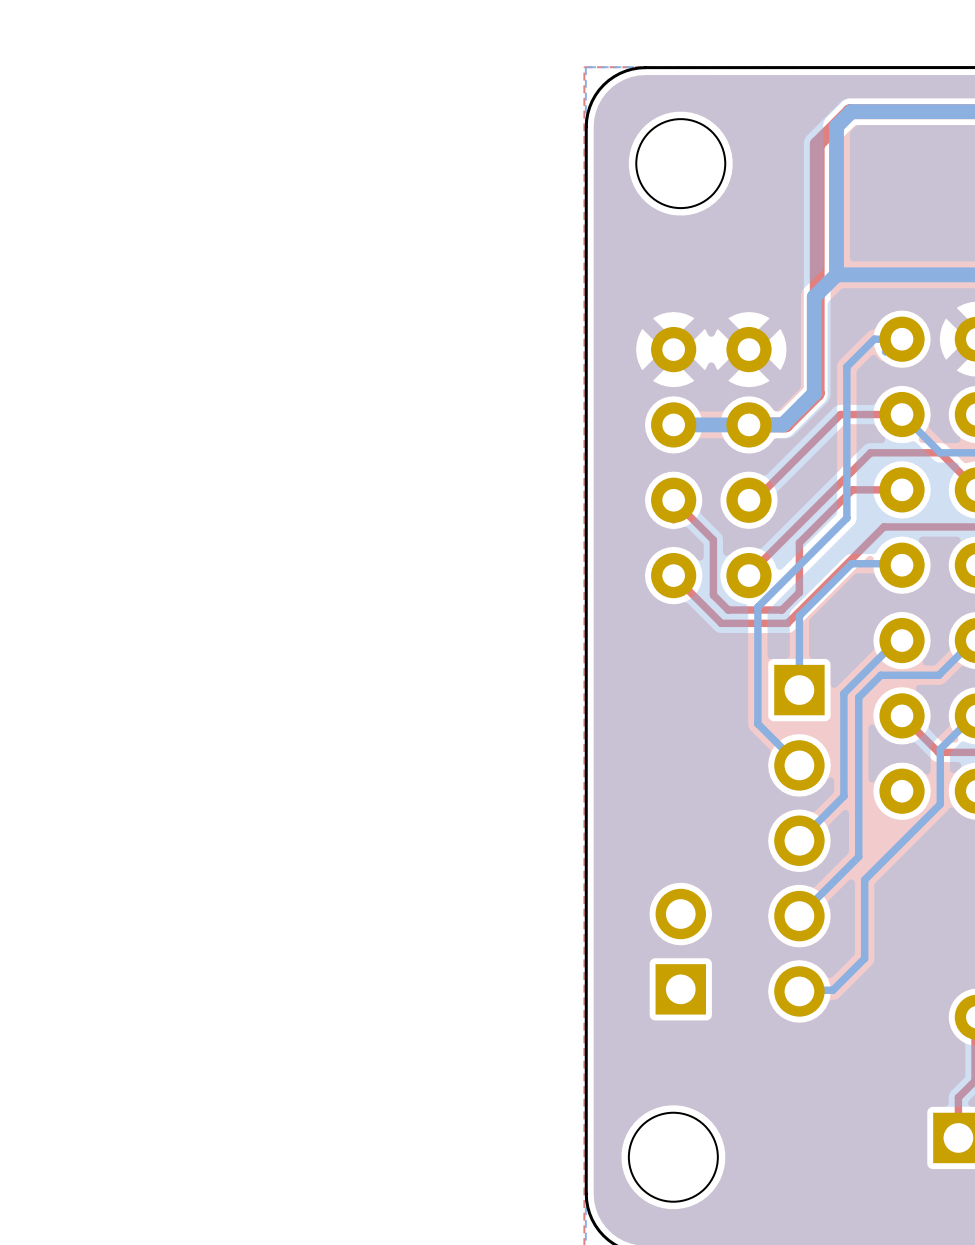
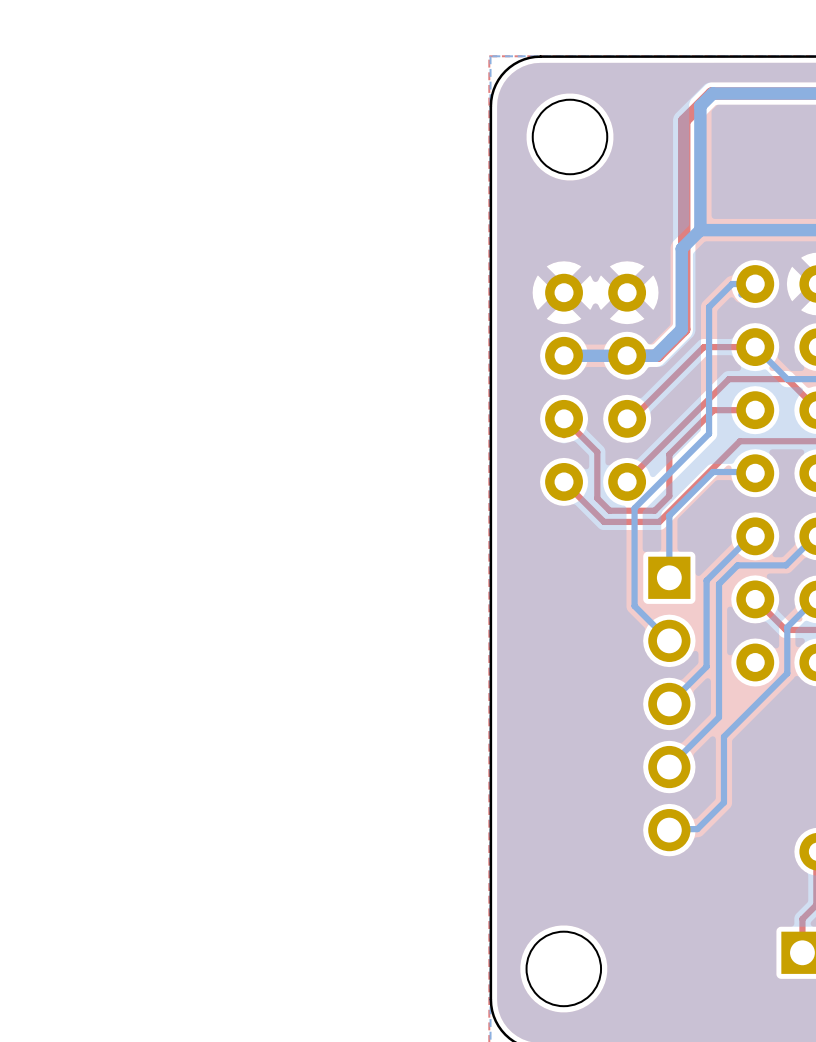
part: (680, 951) -> none

